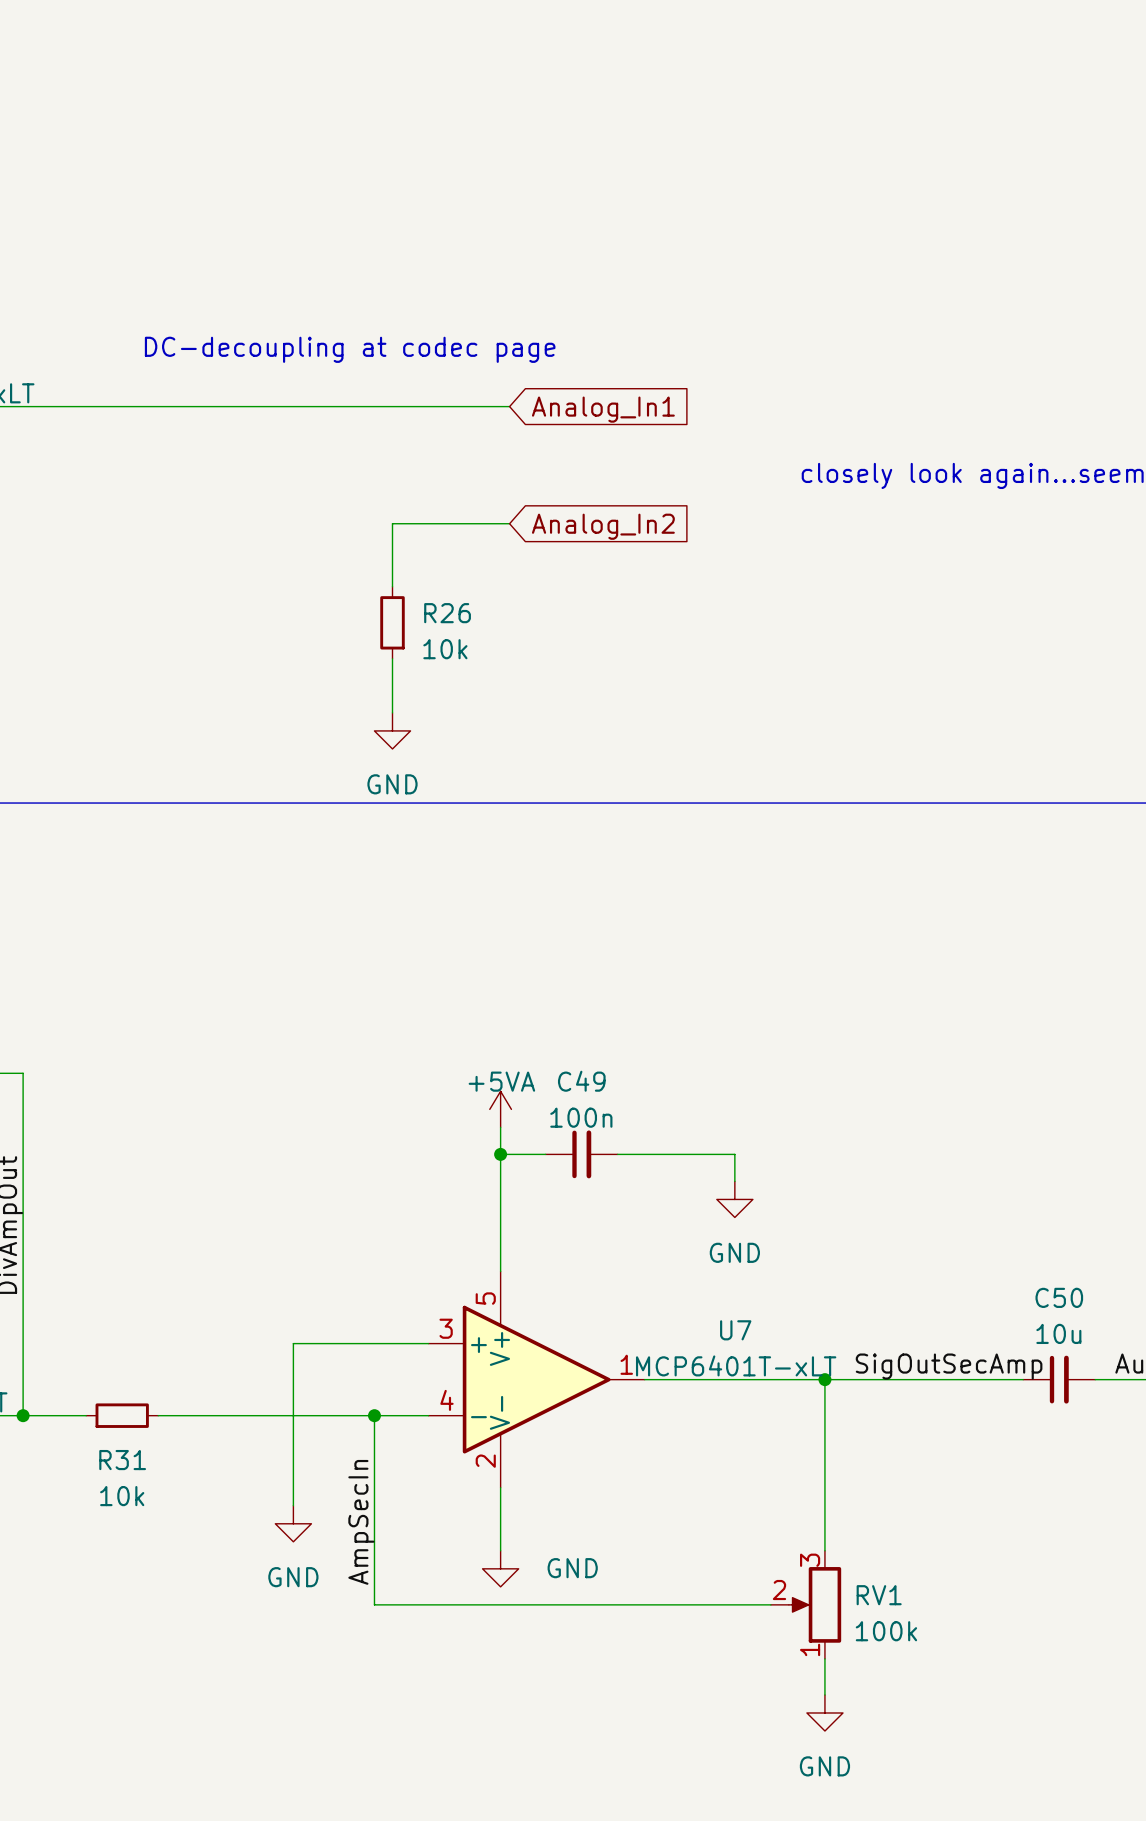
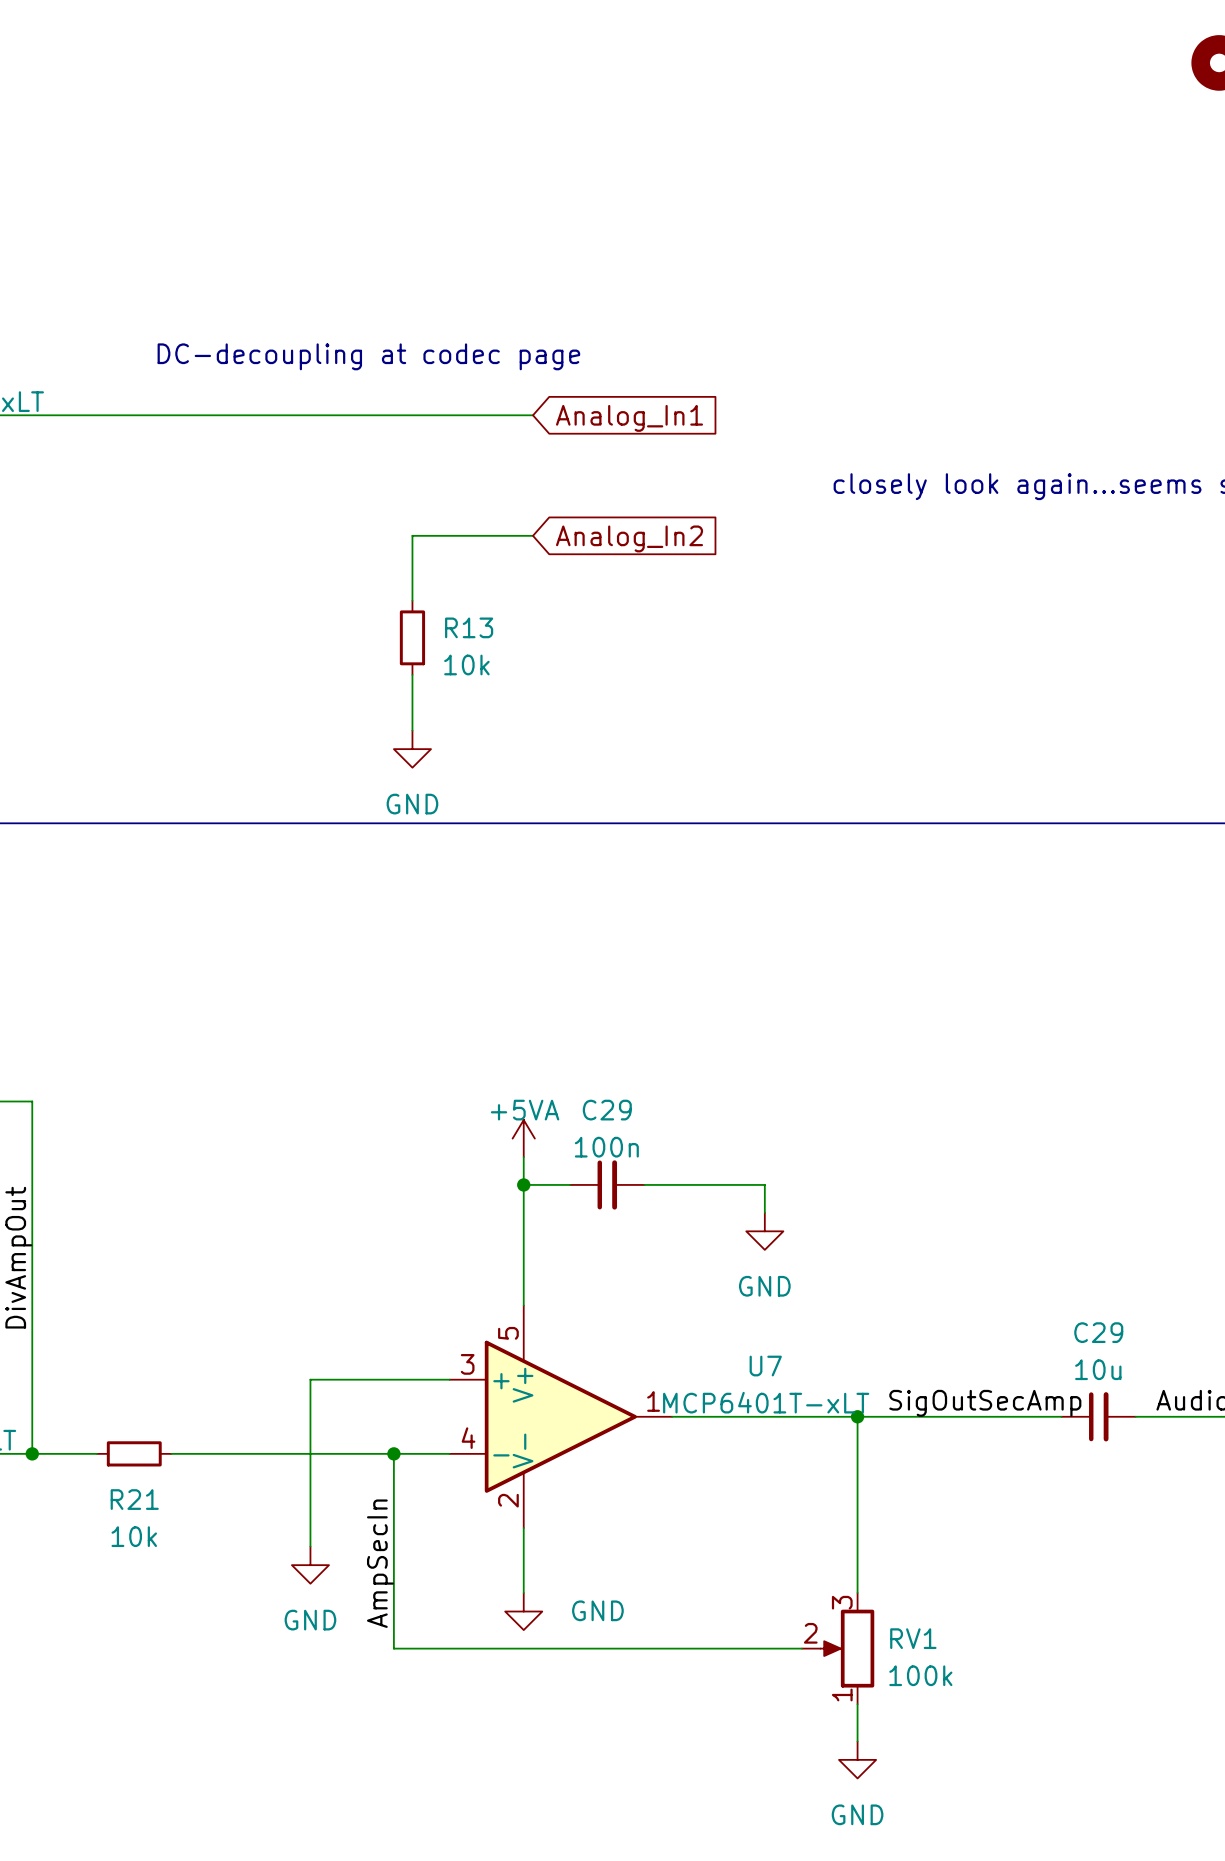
R26 name: R26 (447, 613) -> R13 (469, 627)
C49 name: C49 (581, 1081) -> C29 (607, 1110)
C50 name: C50 (1059, 1297) -> C29 (1098, 1332)
R31 name: R31 (122, 1460) -> R21 (134, 1499)

